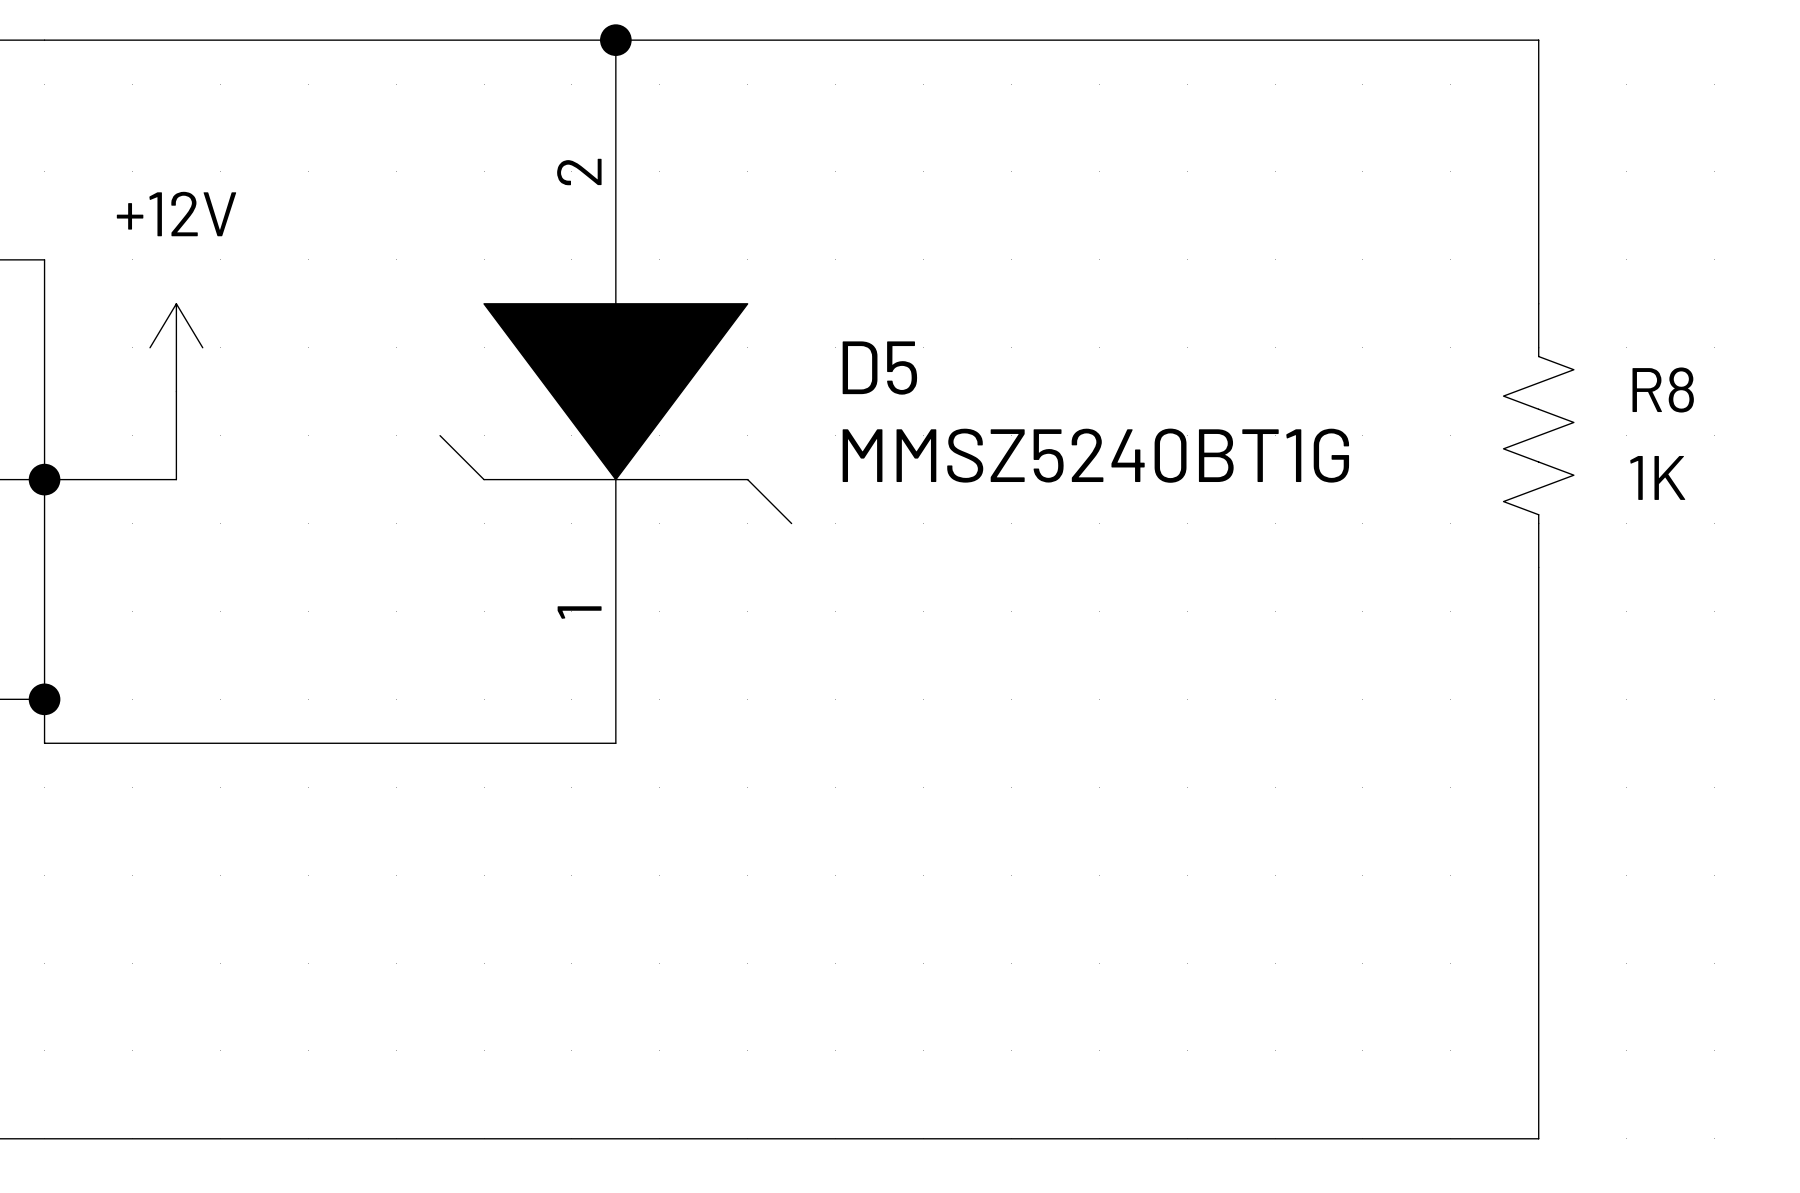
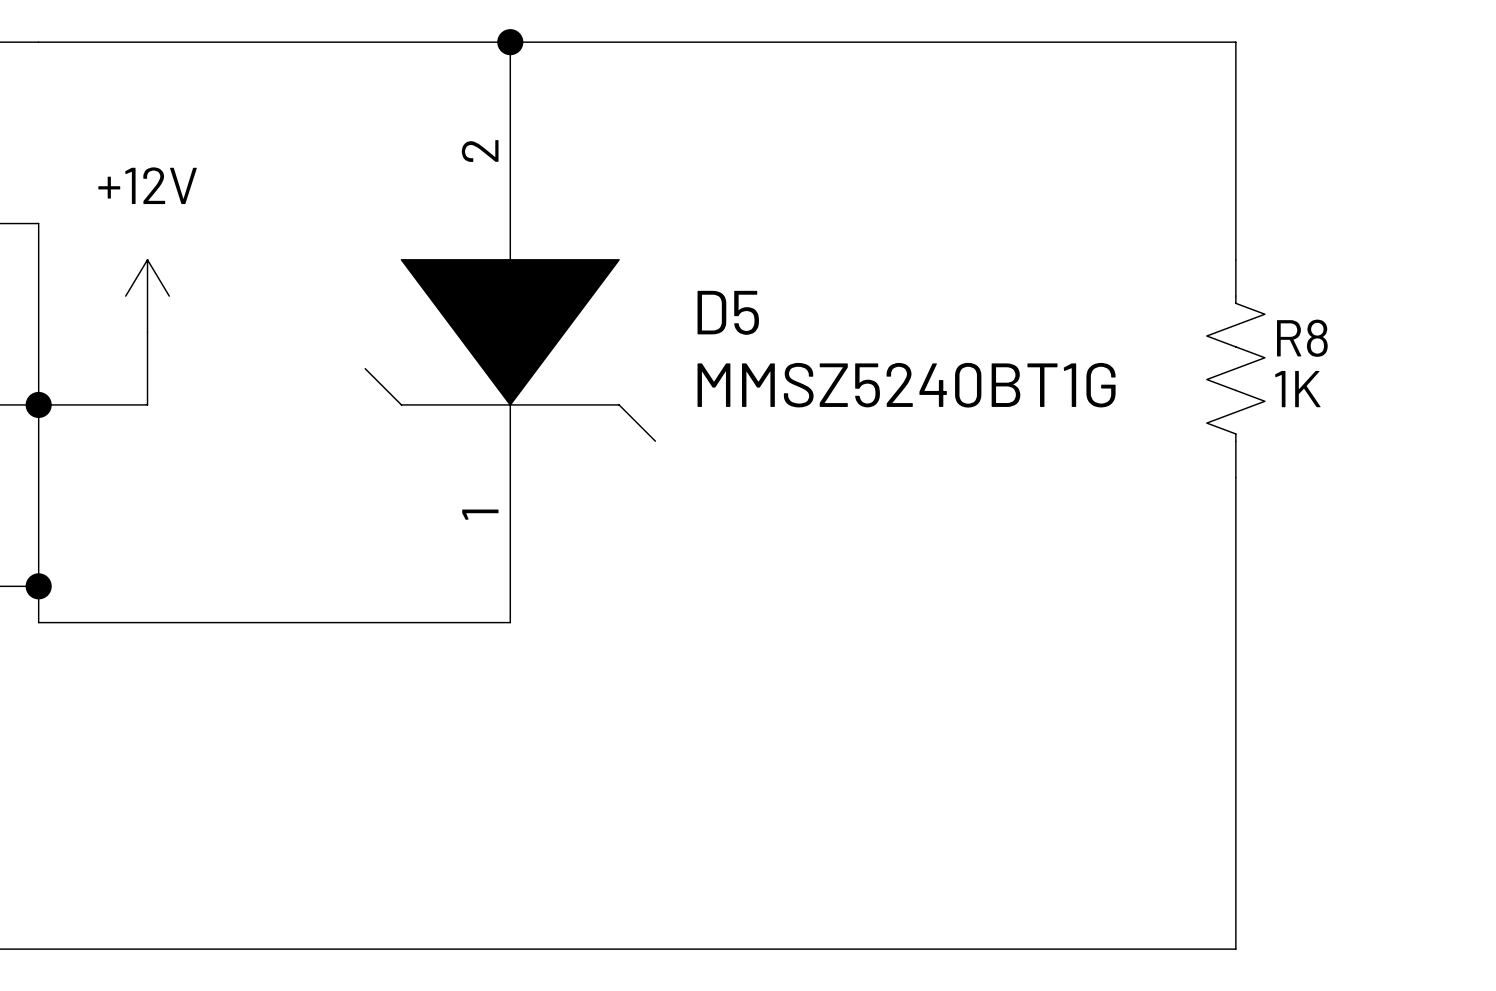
wire: (1494, 40) (1538, 40) (1538, 303) -> (1235, 42) (1235, 259)
R8 name position: R8 (1663, 390) -> R8 (1302, 338)
R8 position: (1538, 435) -> (1235, 368)
R8 value position: 1K (1657, 477) -> 1K (1297, 389)
wire: (1538, 567) (1538, 1138) (1494, 1138) -> (1235, 477) (1235, 949)

